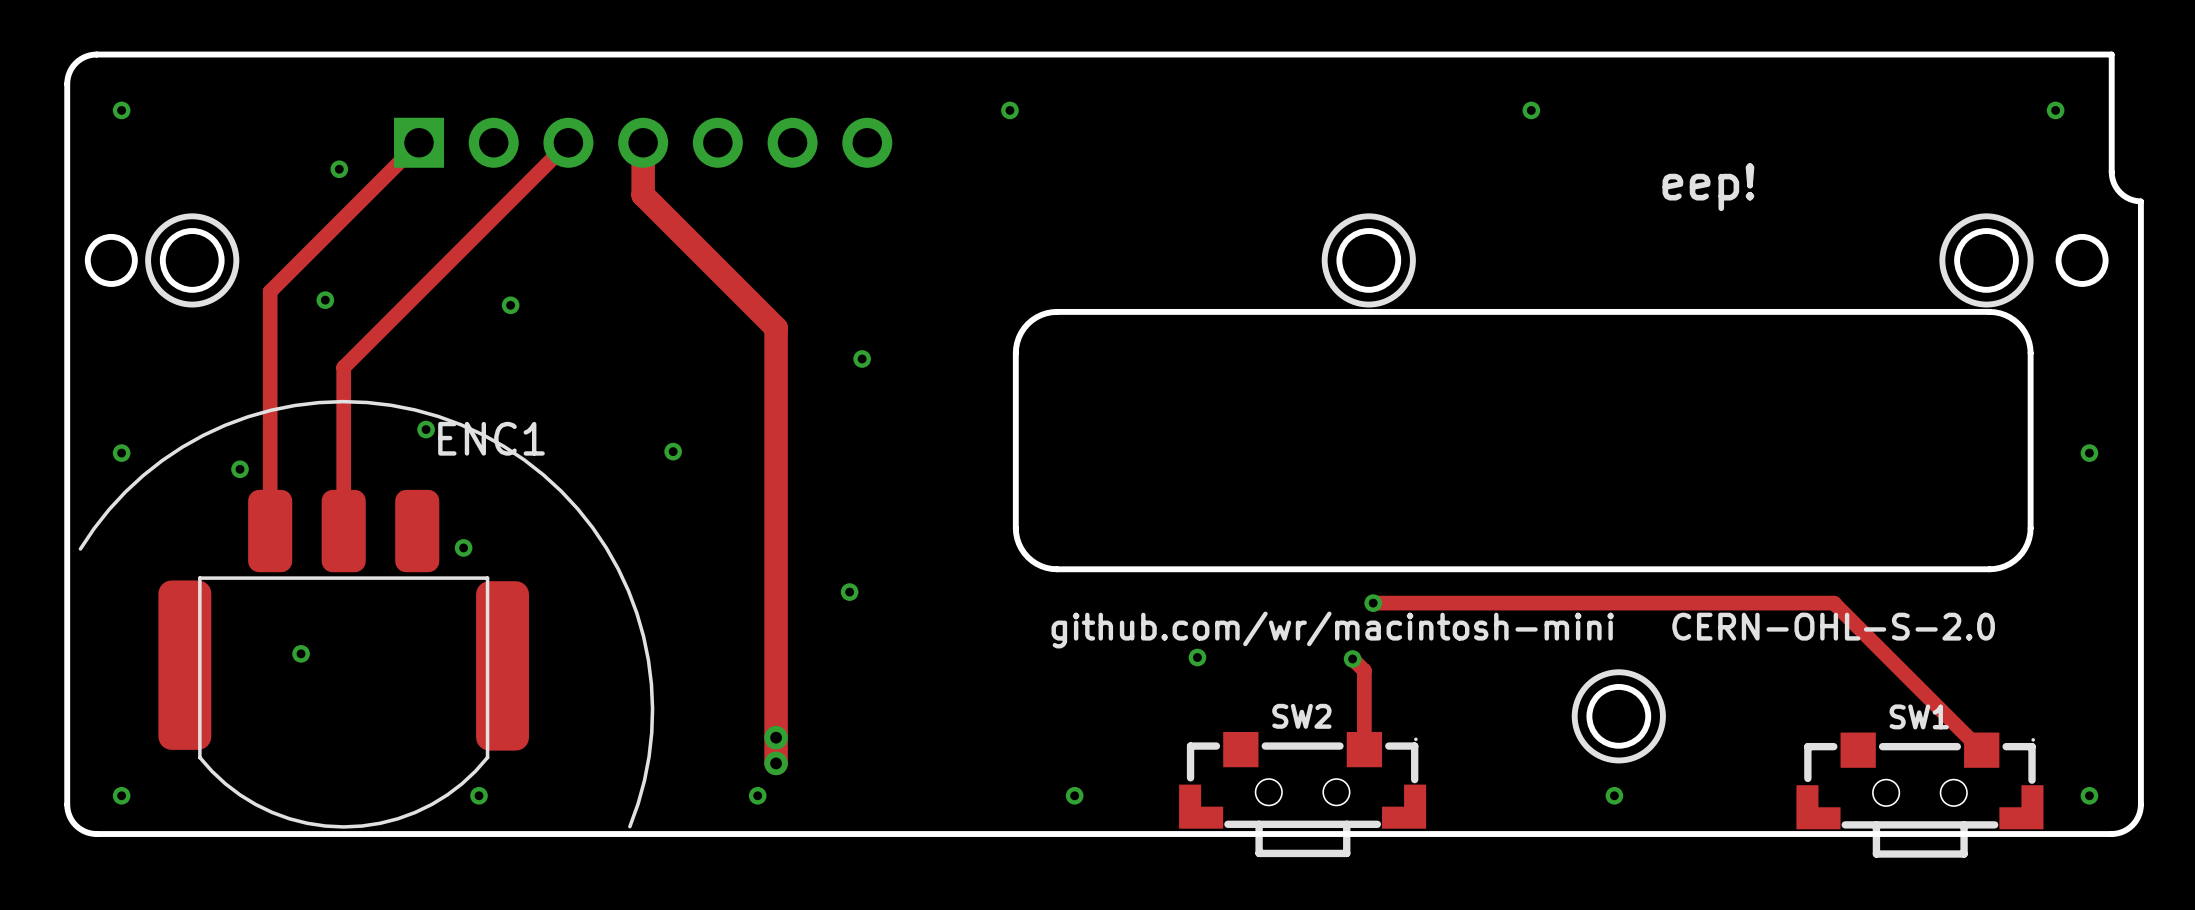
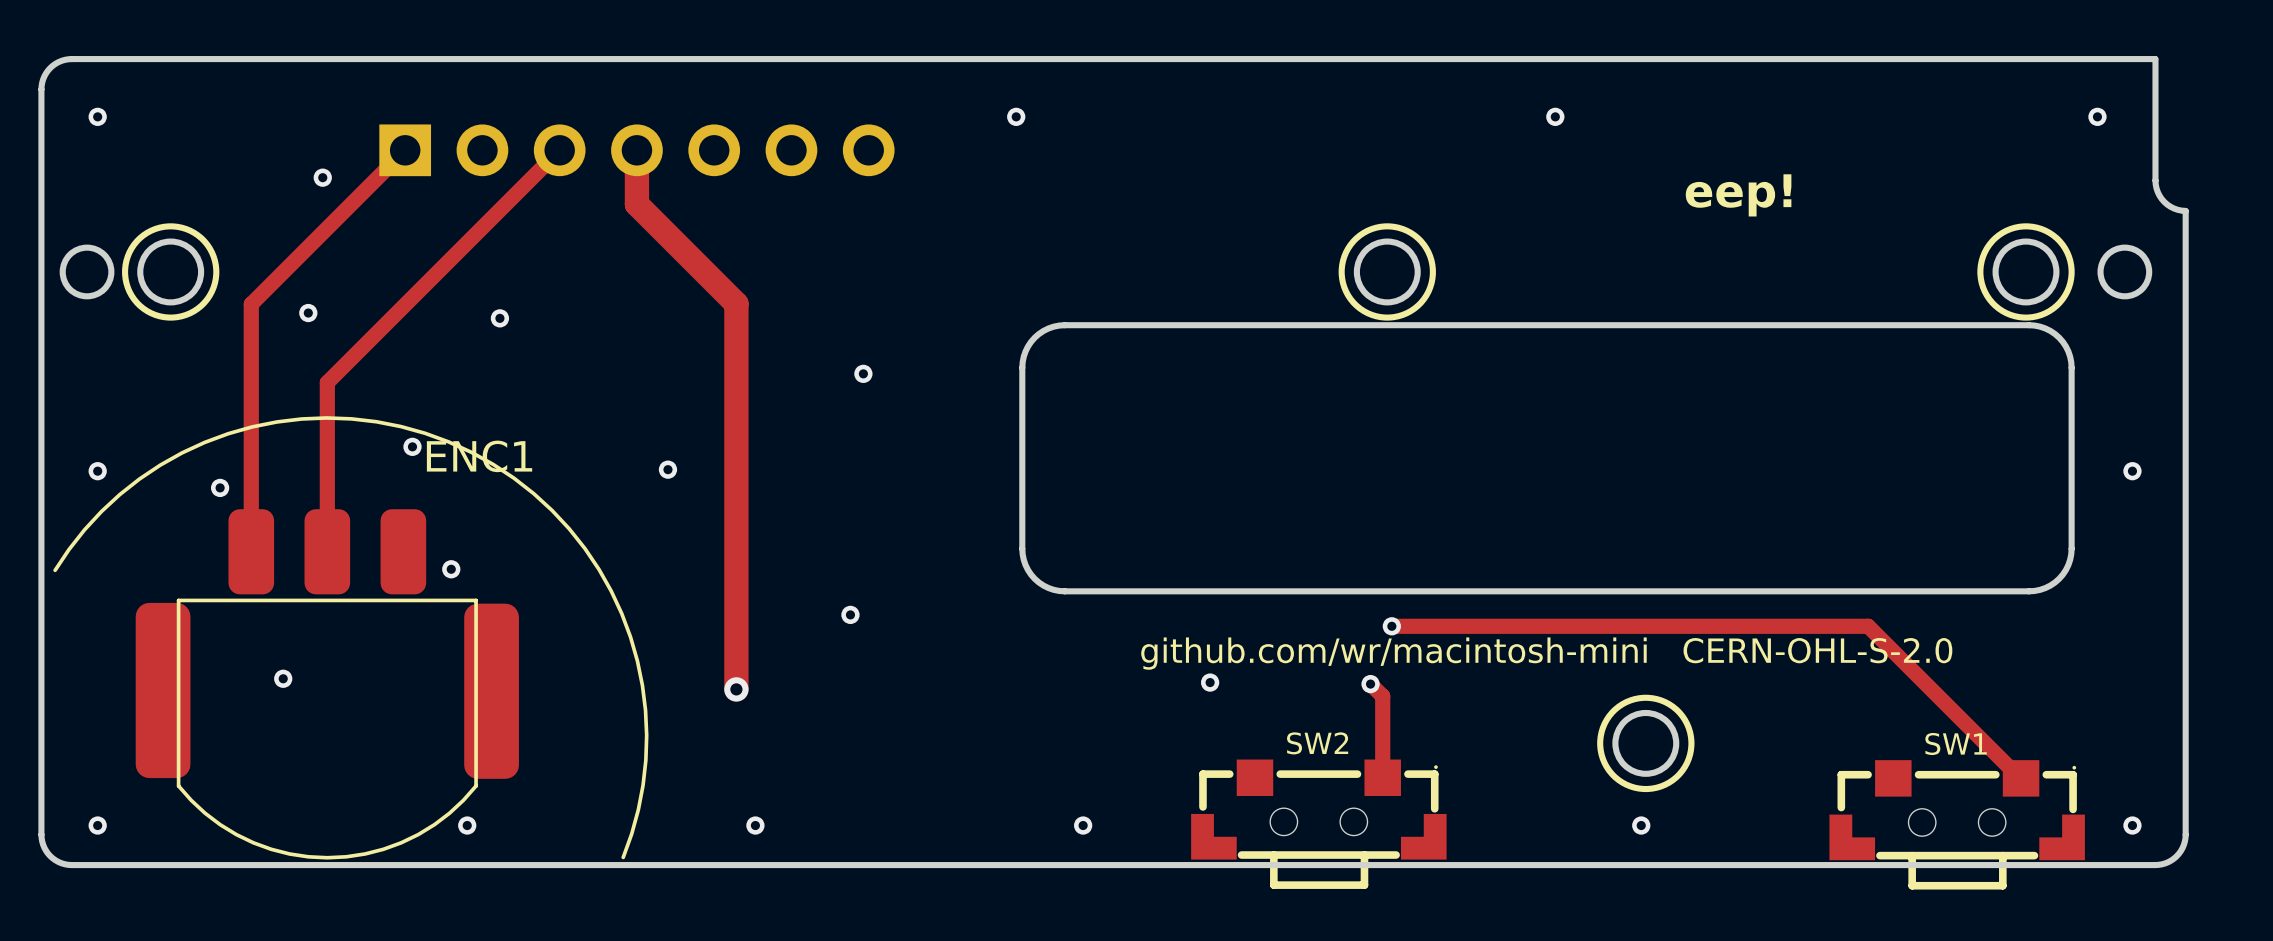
track: (739, 291) (776, 328) (776, 763) -> (736, 303) (736, 689)
via: none -> (736, 689)
via: (776, 737) -> none
via: (776, 763) -> none

